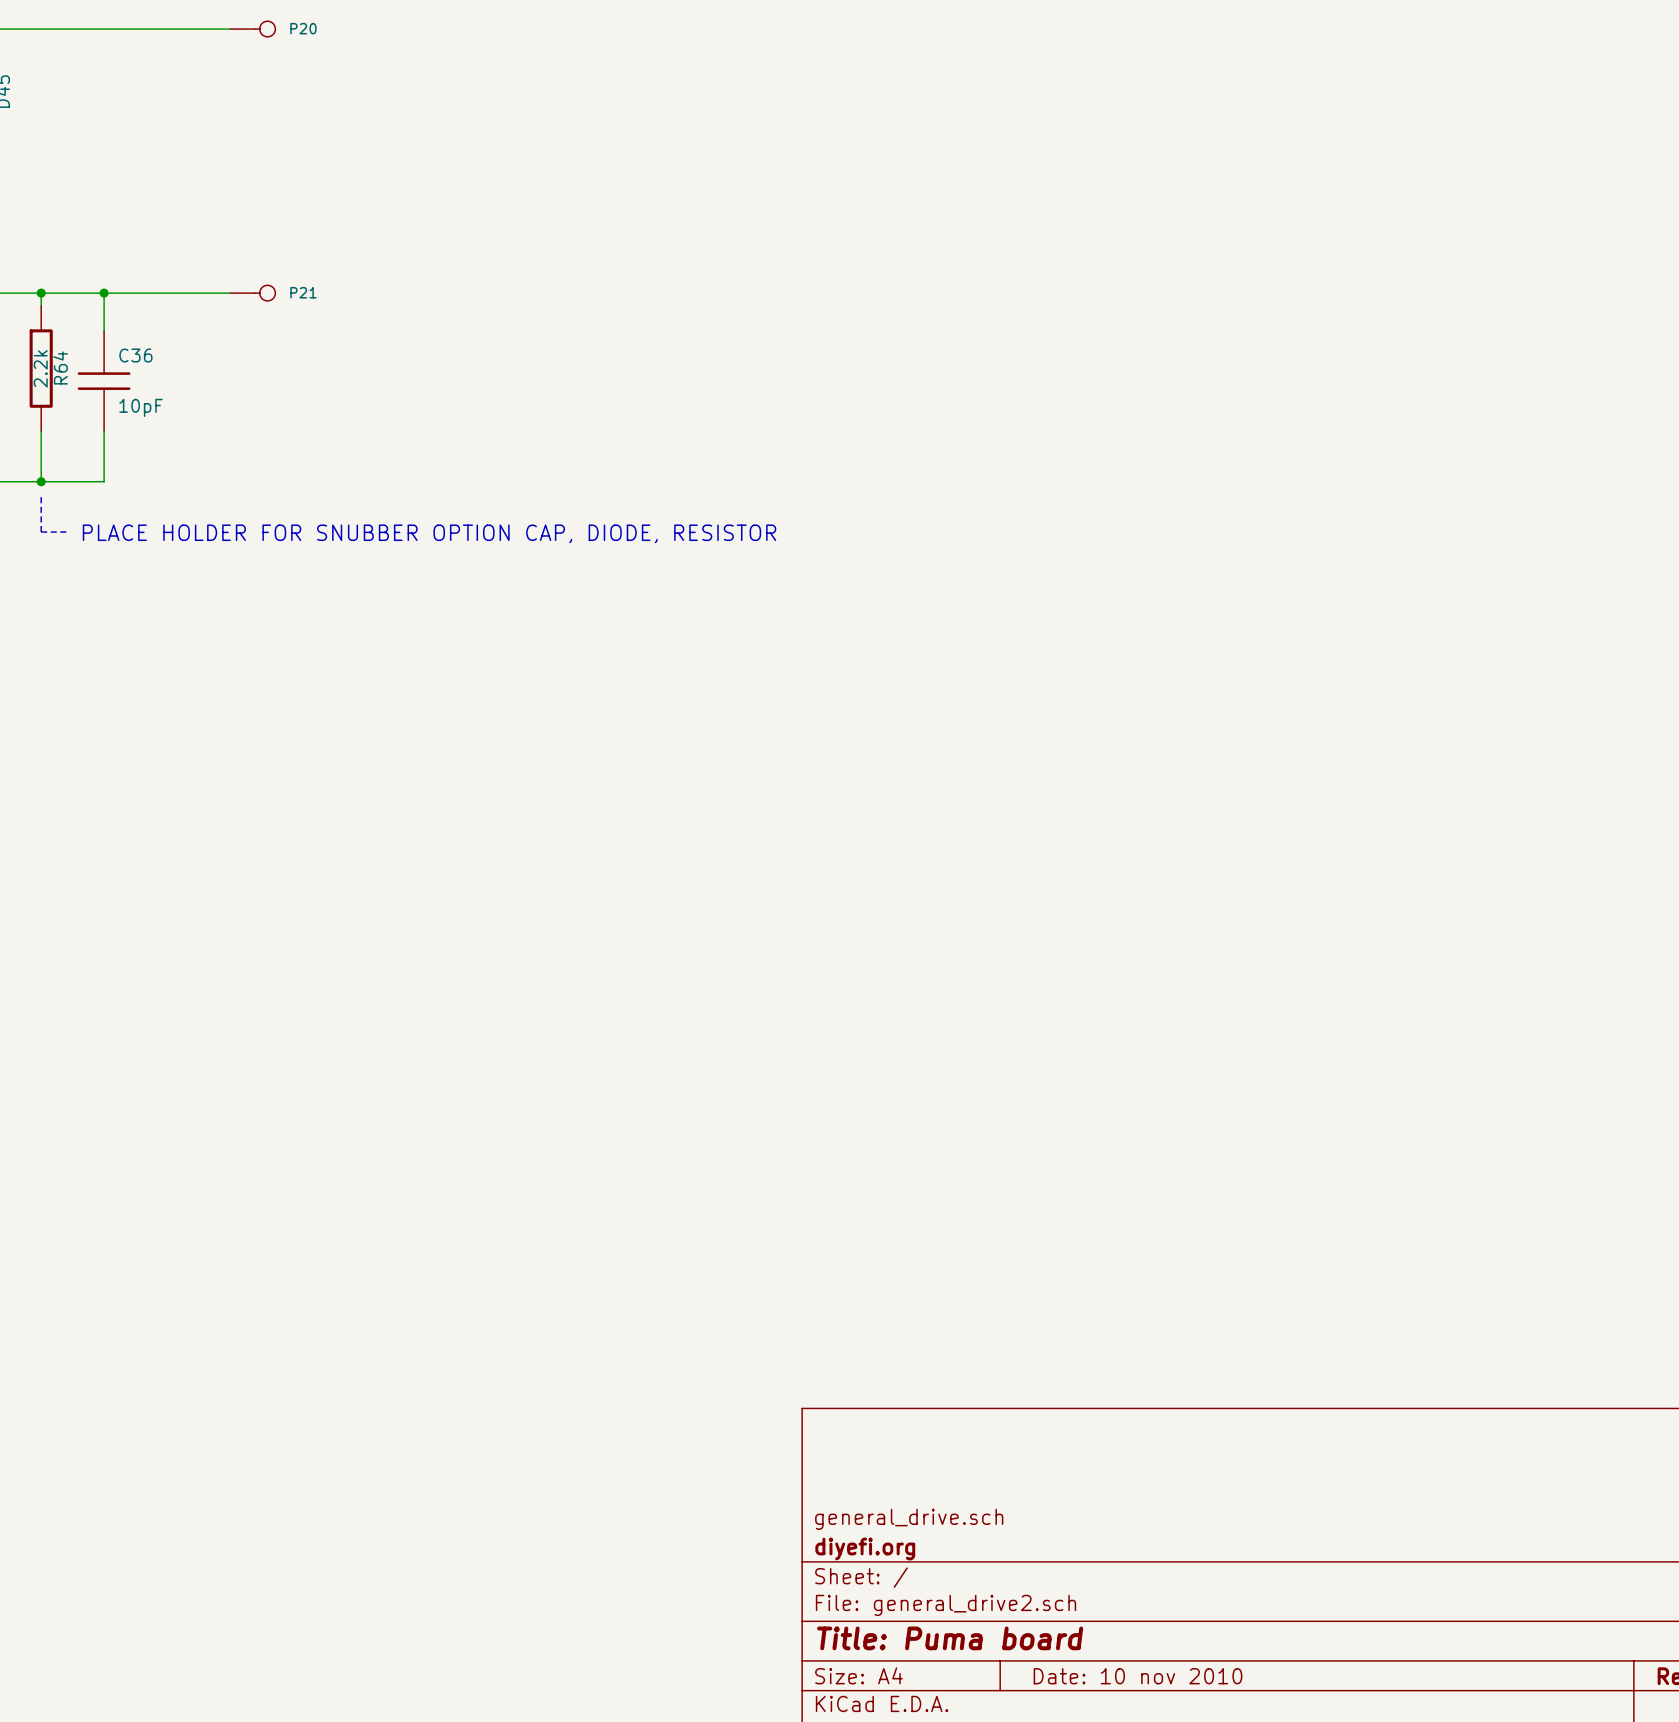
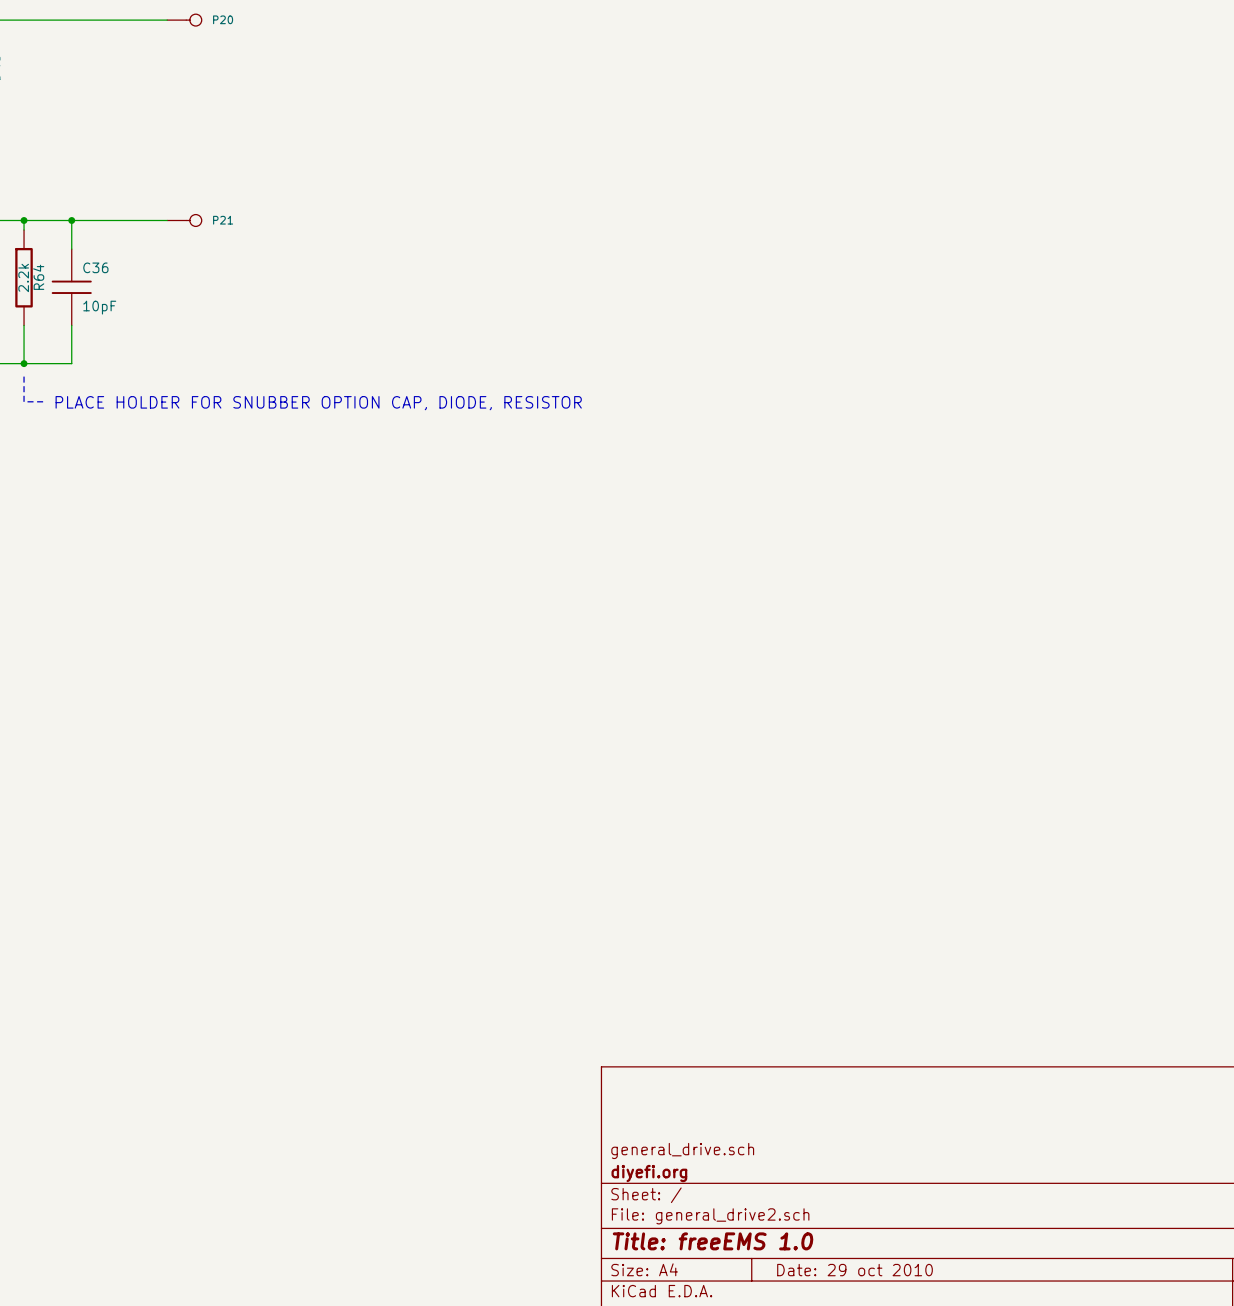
title block: Title: Puma board (950, 1638) -> Title: freeEMS 1.0 (713, 1241)
title block: Date: 10 nov 2010 (1138, 1676) -> Date: 29 oct 2010 (855, 1270)

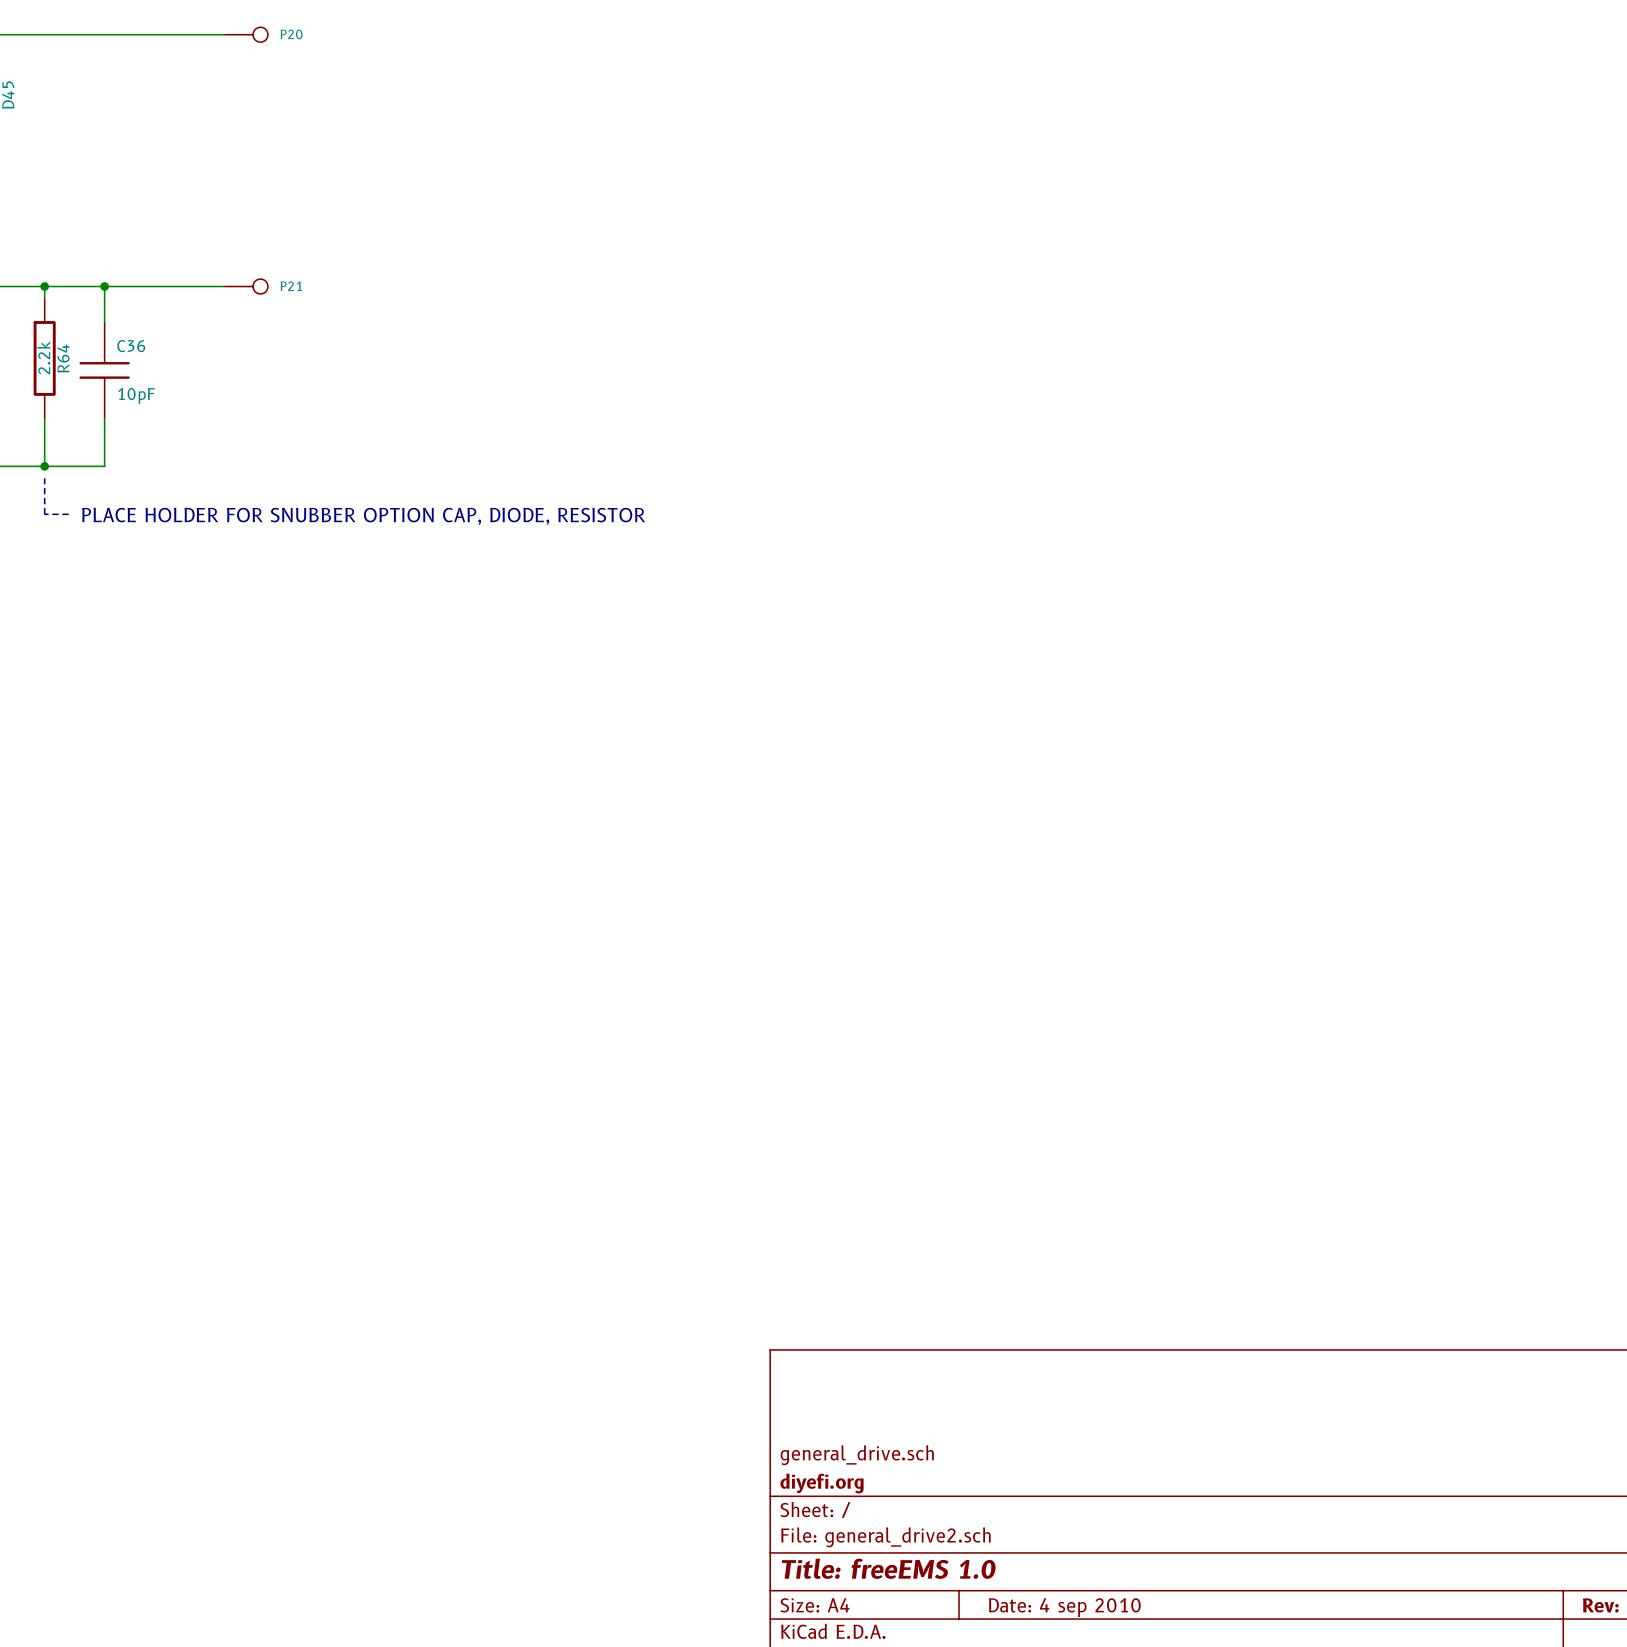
title block: Date: 29 oct 2010 (855, 1270) -> Date: 4 sep 2010 (1064, 1607)

